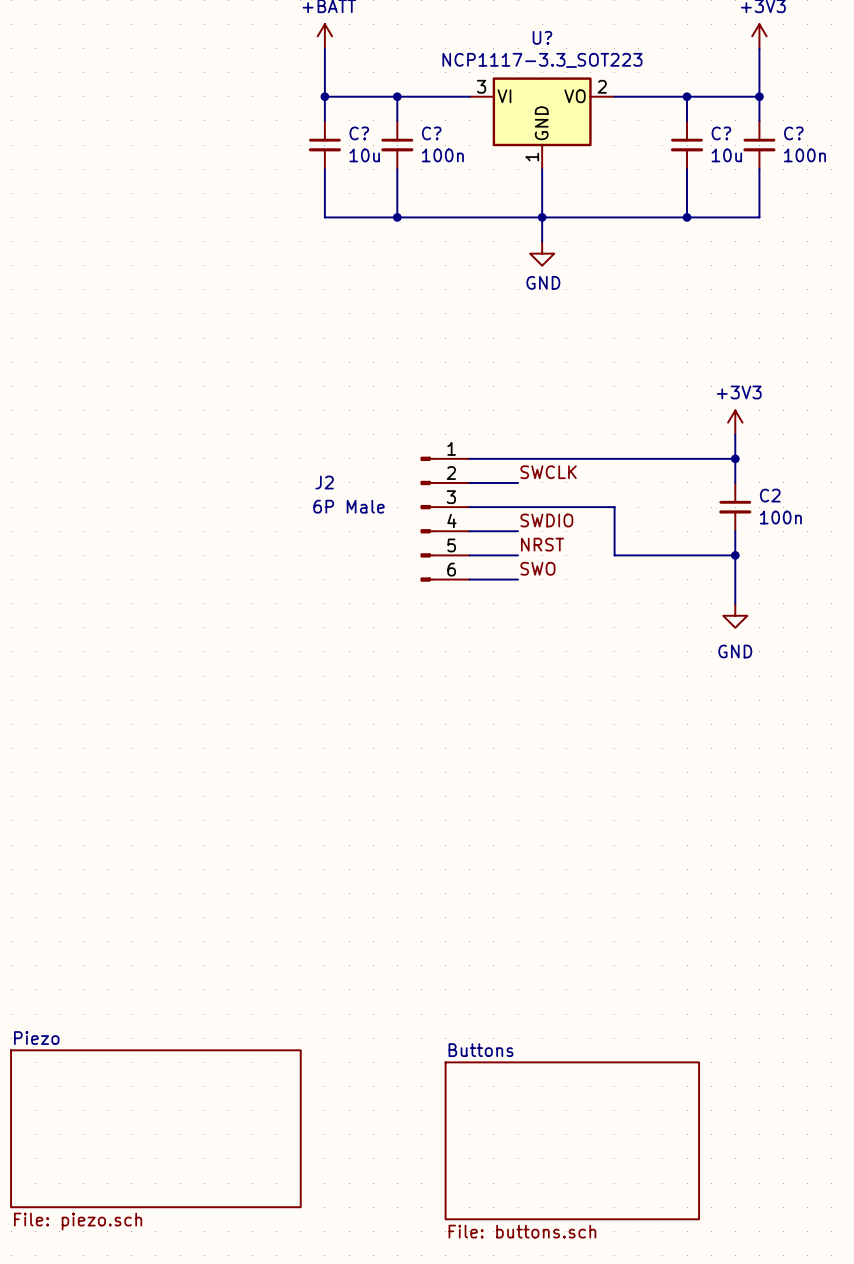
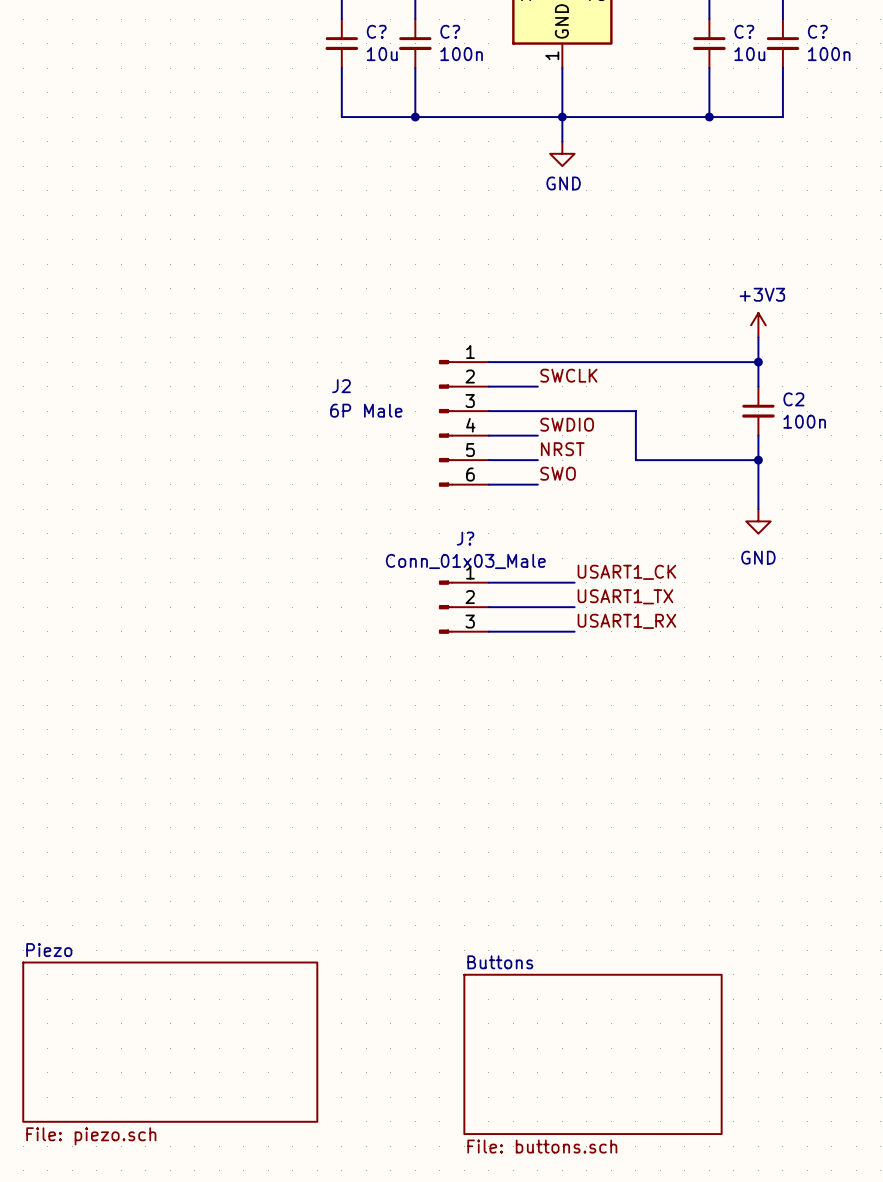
label: none -> USART1_CK (626, 572)
wire: none -> (488, 582) (574, 582)
label: none -> USART1_TX (625, 596)
J?: none -> Conn_01x03_Male (463, 607)
wire: none -> (488, 607) (574, 607)
label: none -> USART1_RX (626, 621)
wire: none -> (488, 631) (574, 631)

